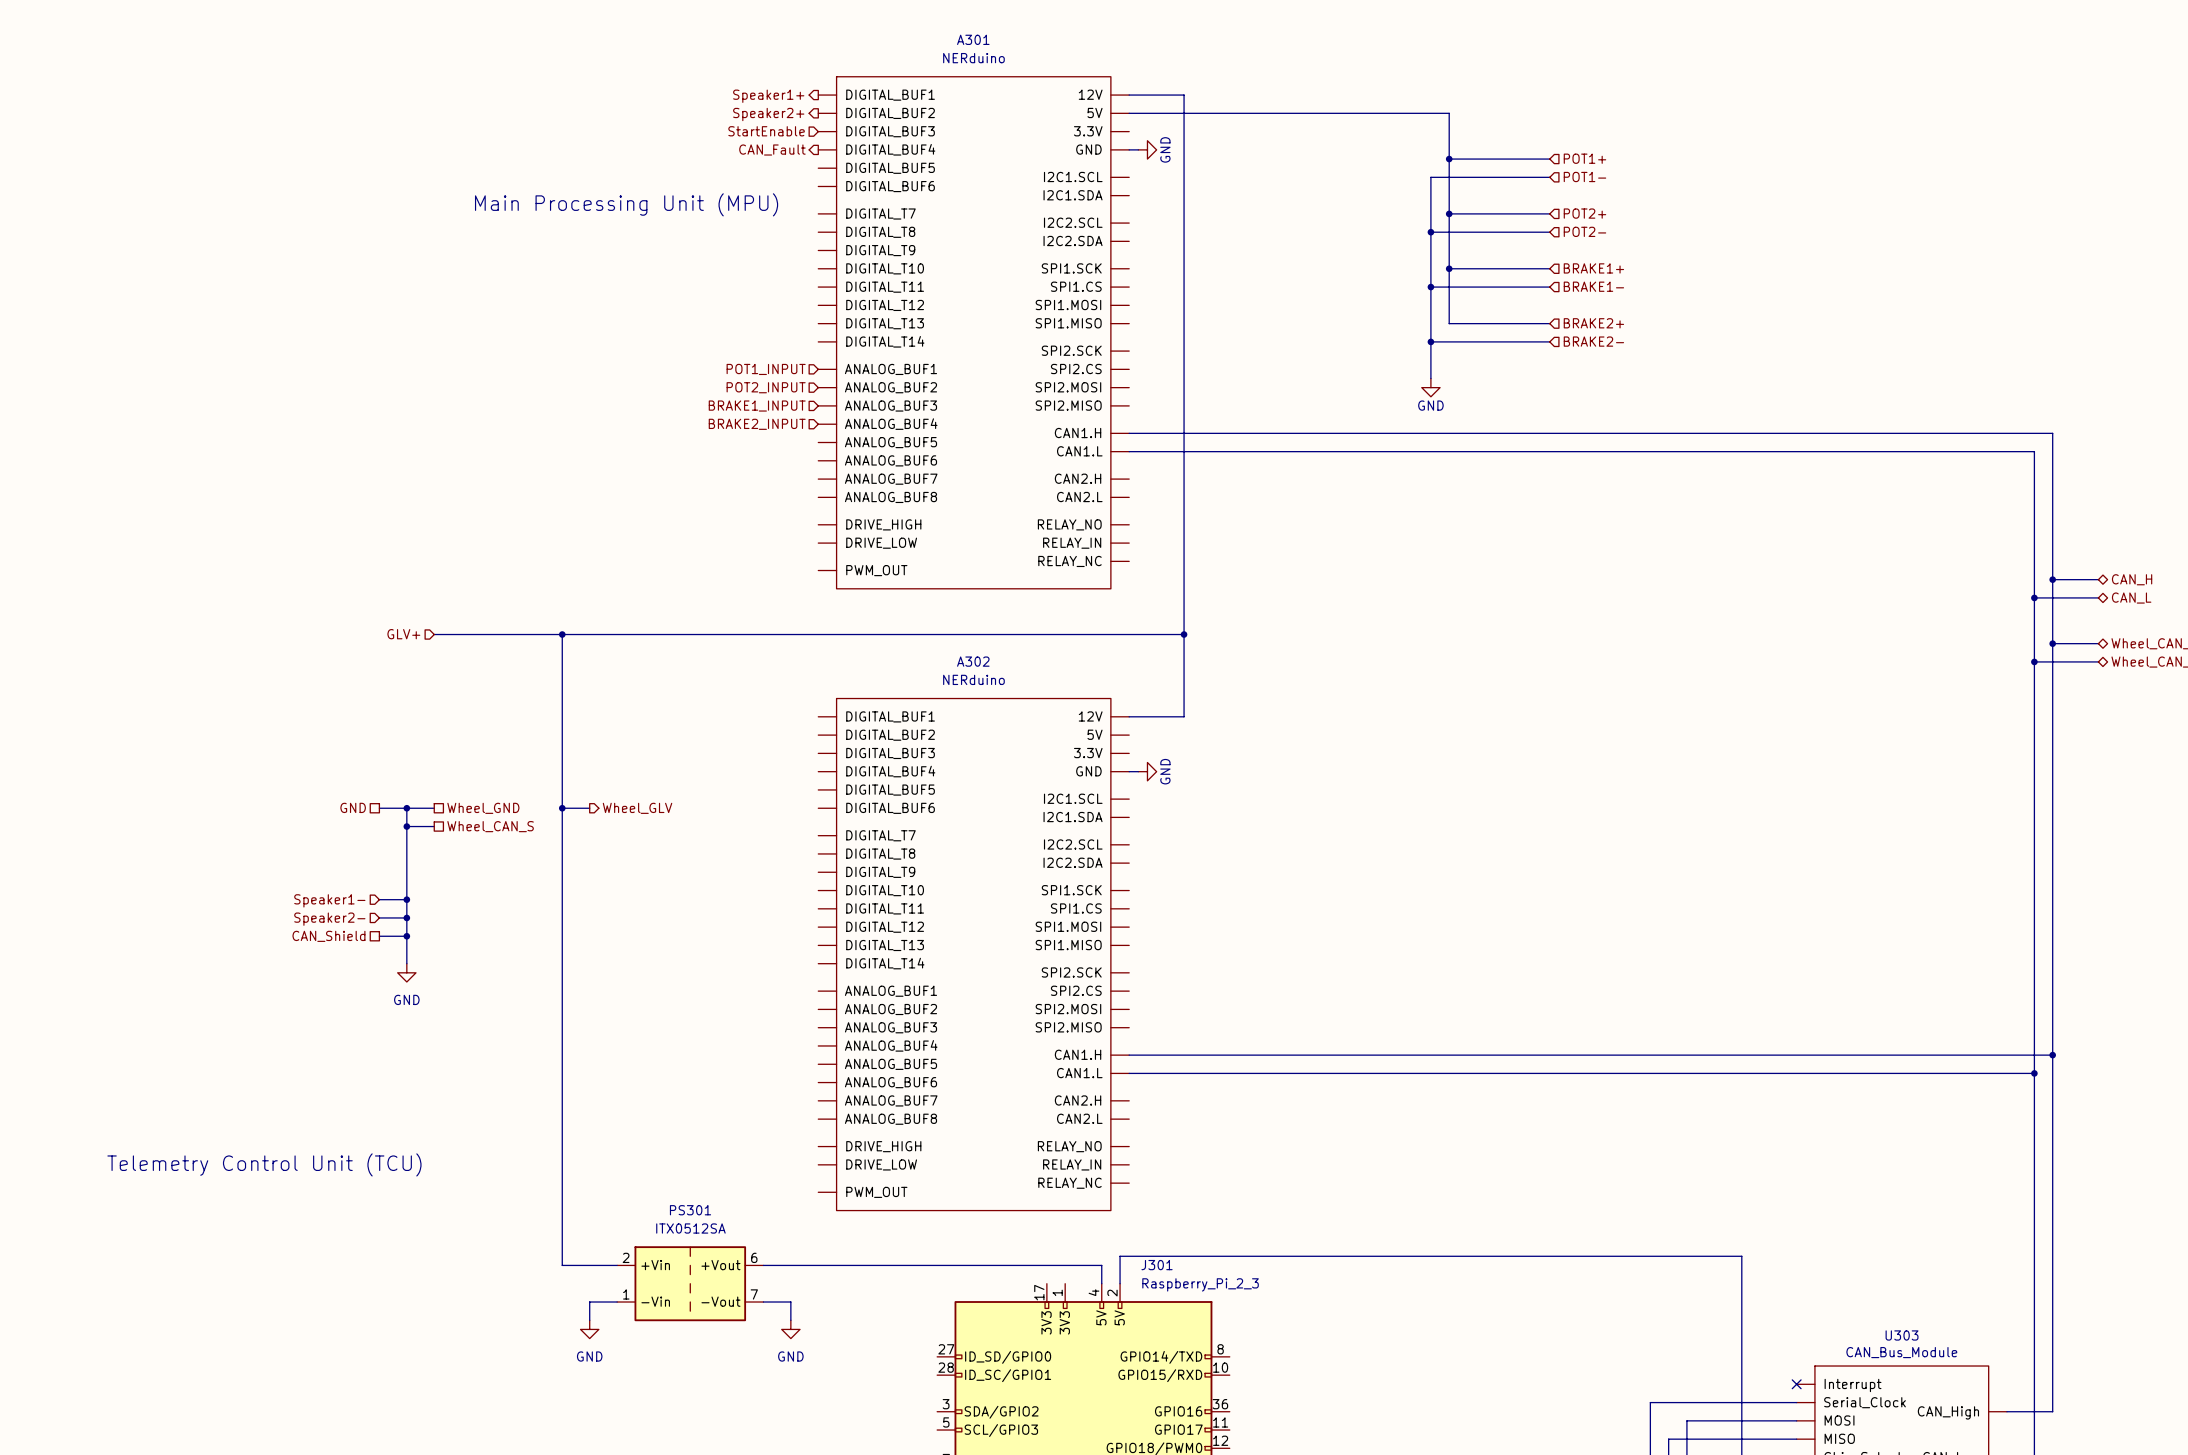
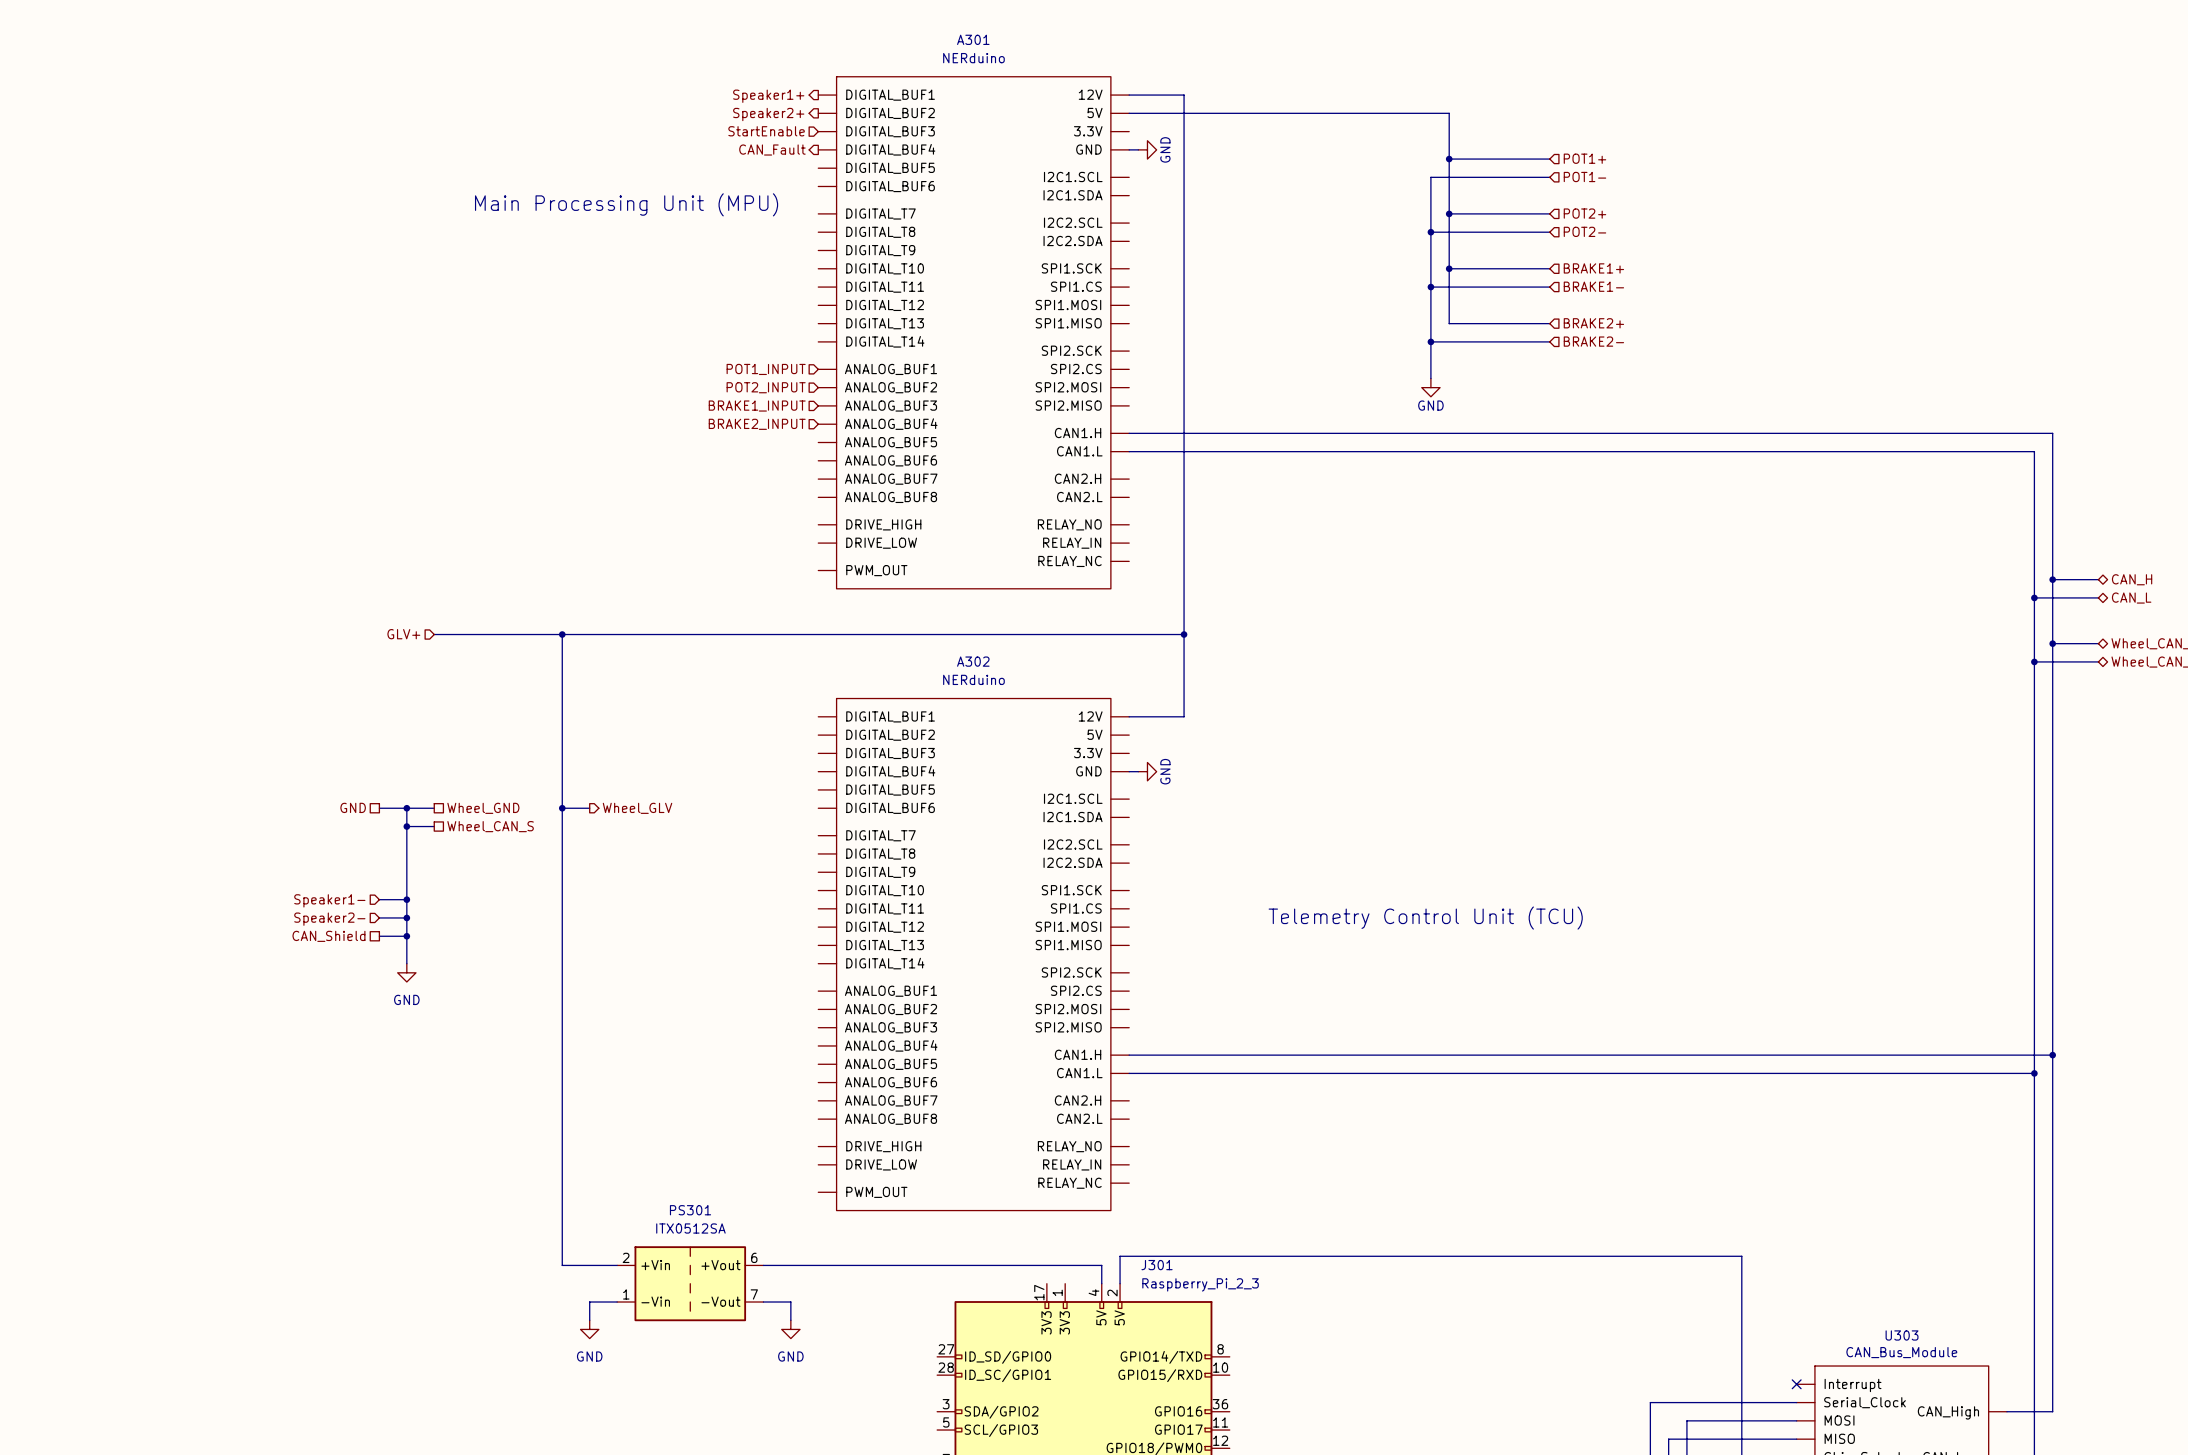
text: none -> Telemetry Control Unit (TCU) (1425, 918)
text: Telemetry Control Unit (TCU) (264, 1164) -> none

